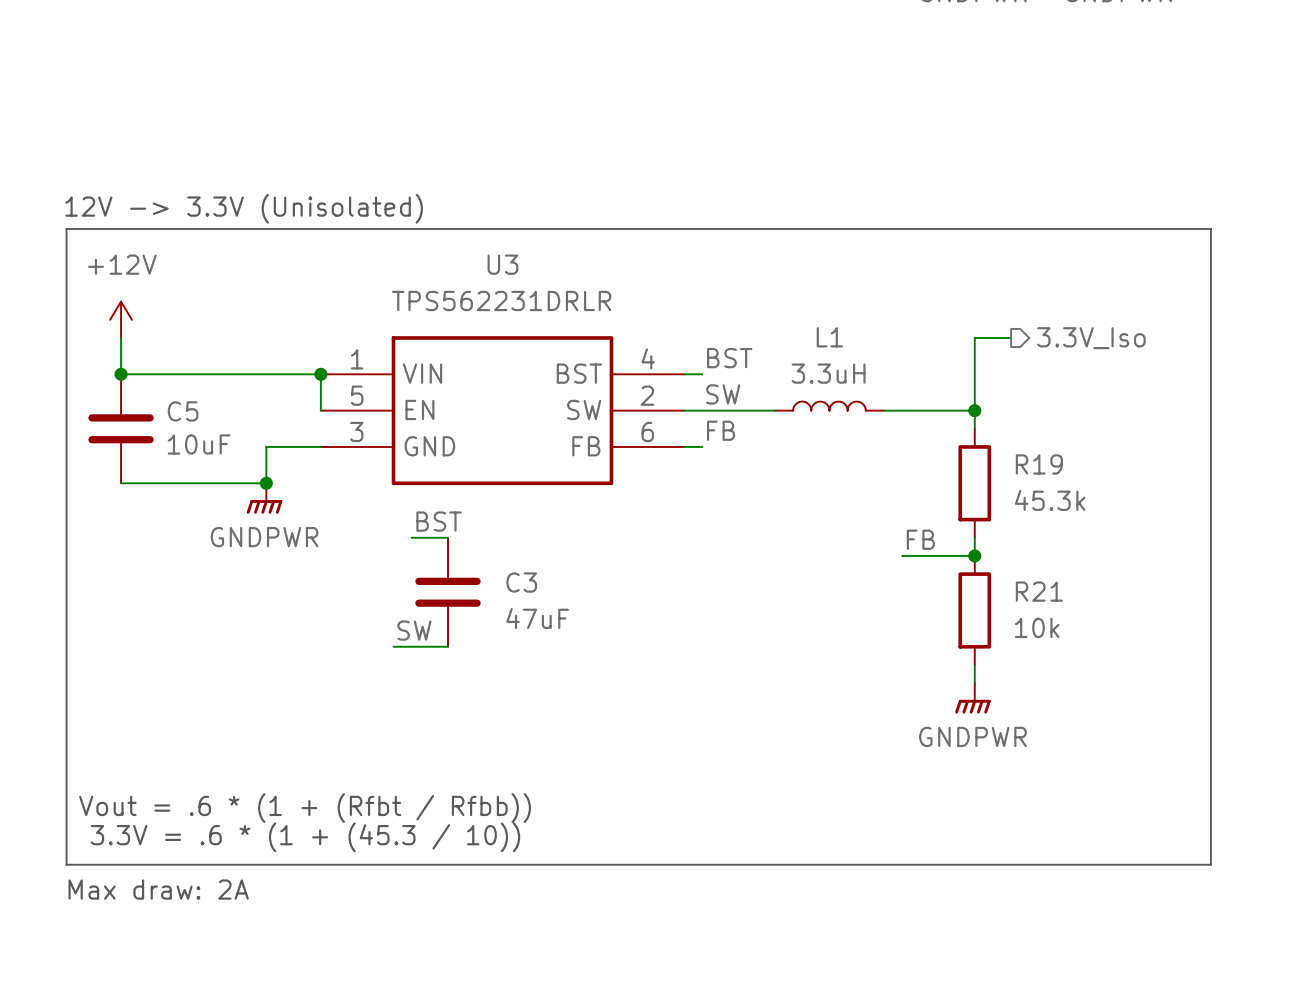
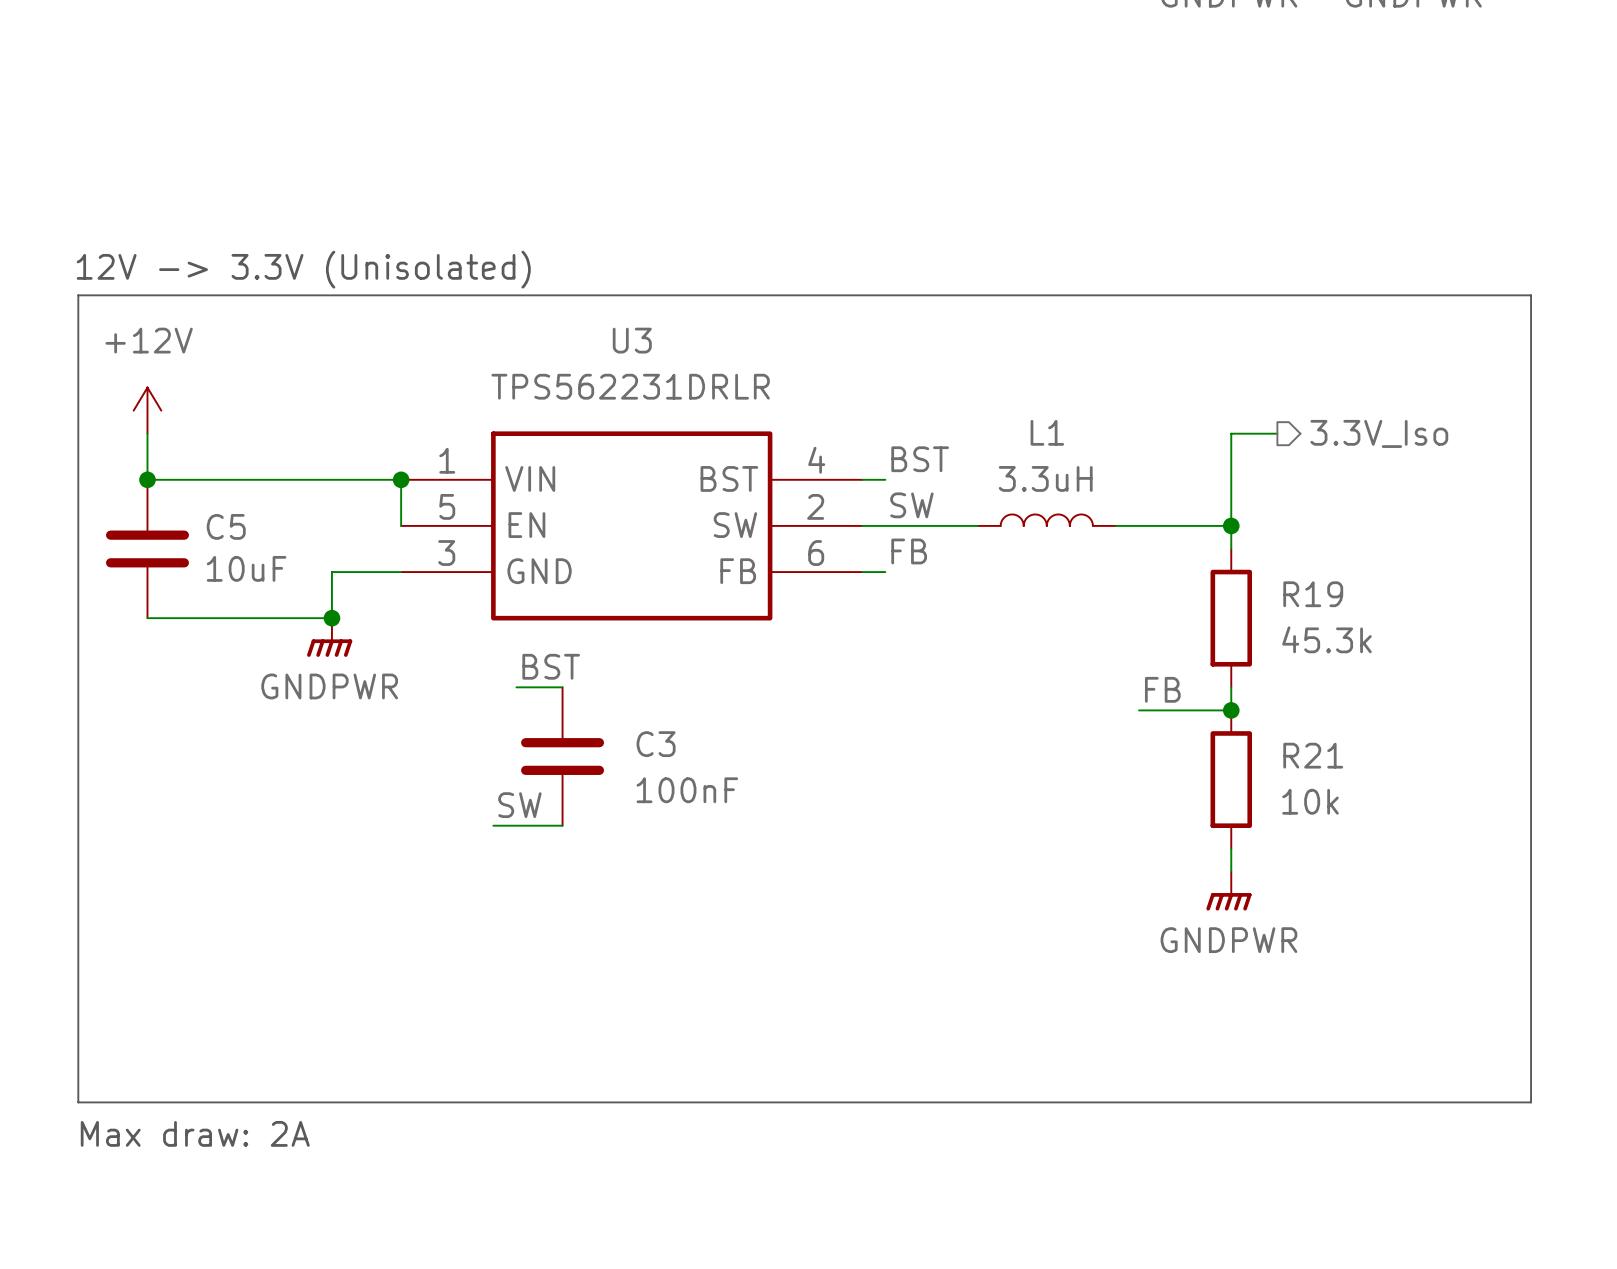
C3 value: 47uF (537, 618) -> 100nF (687, 790)
text: Vout = .6 * (1 + (Rfbt / Rfbb)) (305, 808) -> none
text: 3.3V = .6 * (1 + (45.3 / 10)) (305, 837) -> none

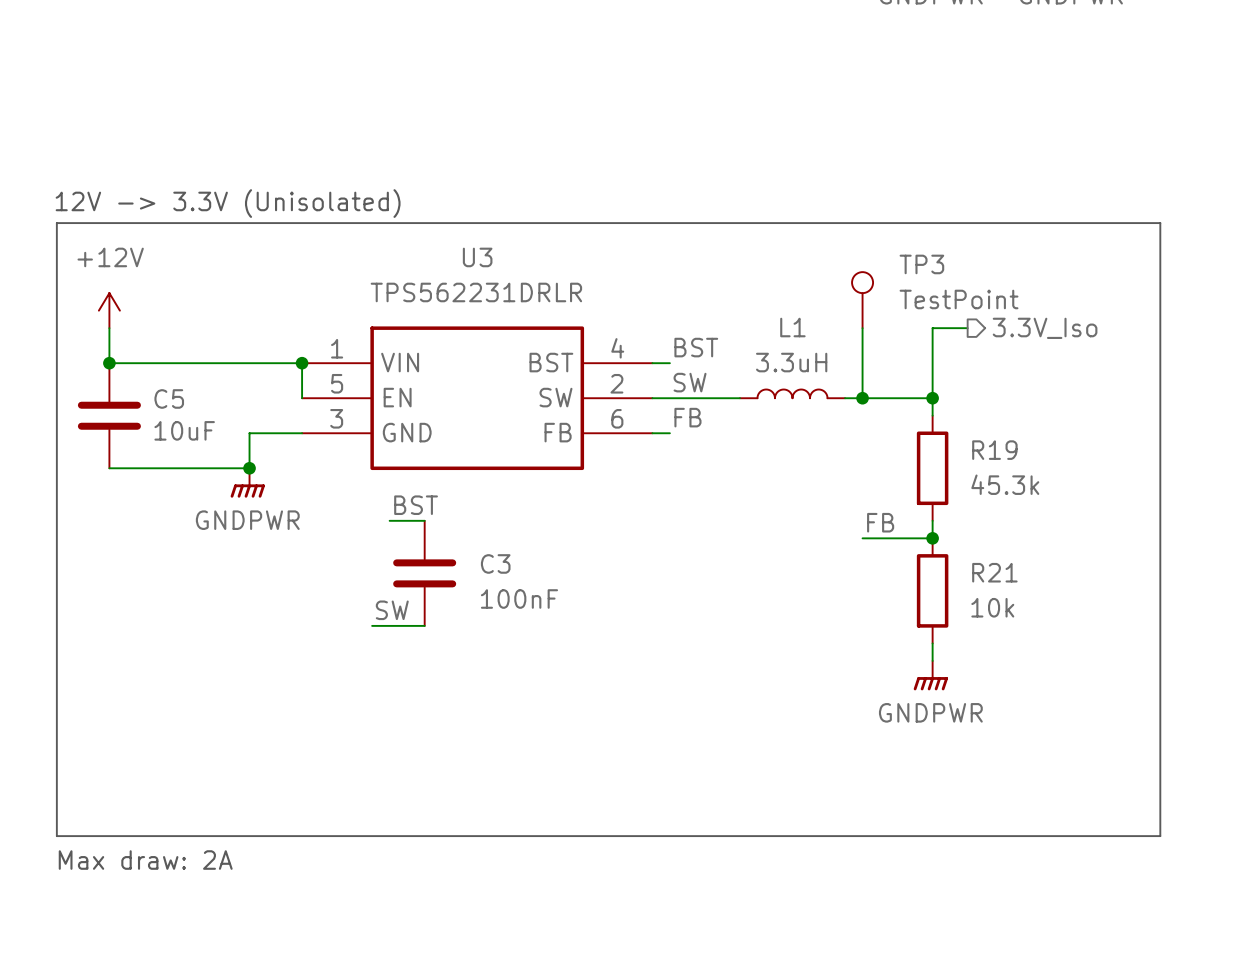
TP3: none -> TestPoint (862, 300)
wire: none -> (862, 328) (862, 398)
junction: none -> (862, 398)

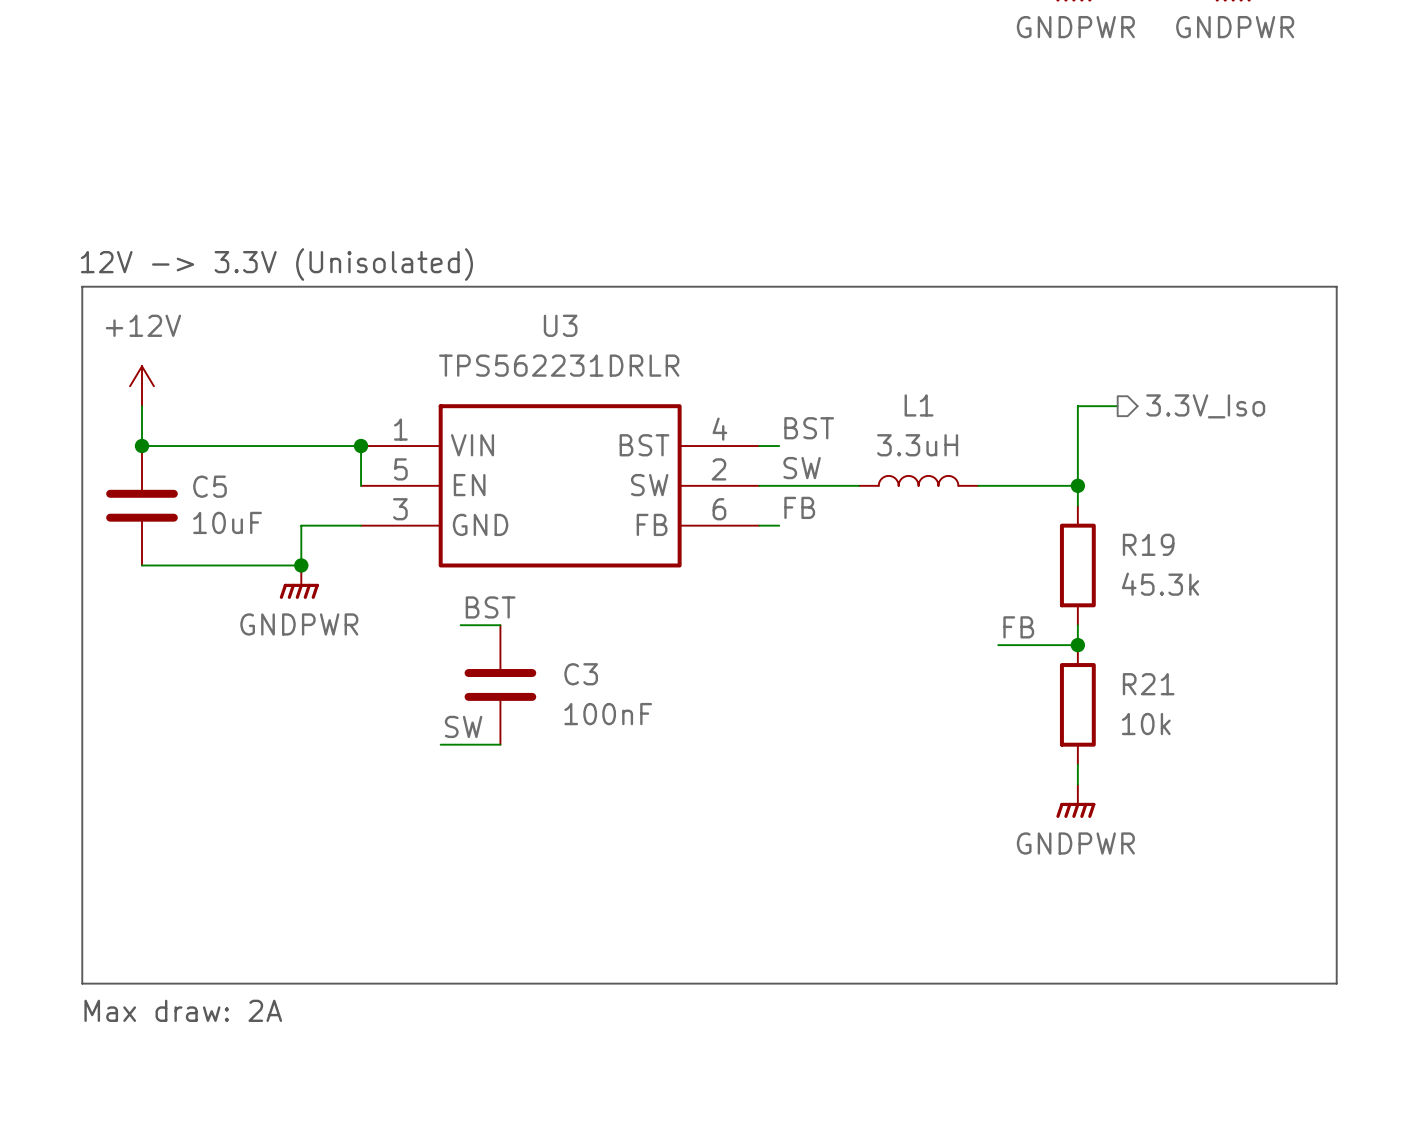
TP3: TestPoint (862, 300) -> none
wire: (862, 328) (862, 398) -> none
junction: (862, 398) -> none

